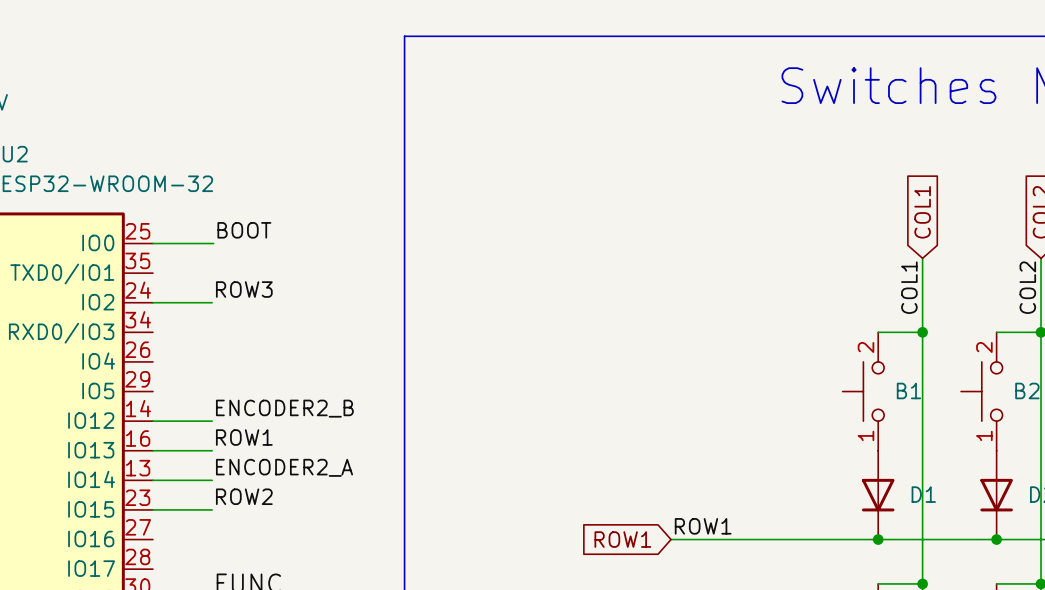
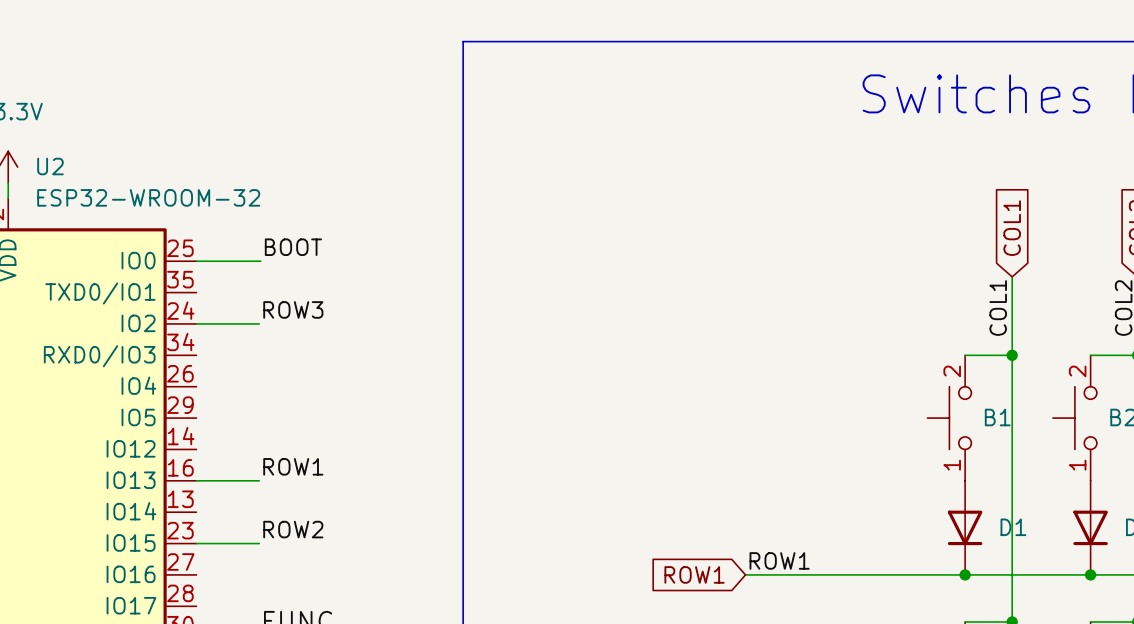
label: ENCODER2_B (284, 408) -> none
wire: (152, 421) (212, 421) -> none
label: ENCODER2_A (284, 467) -> none
wire: (152, 480) (212, 480) -> none

